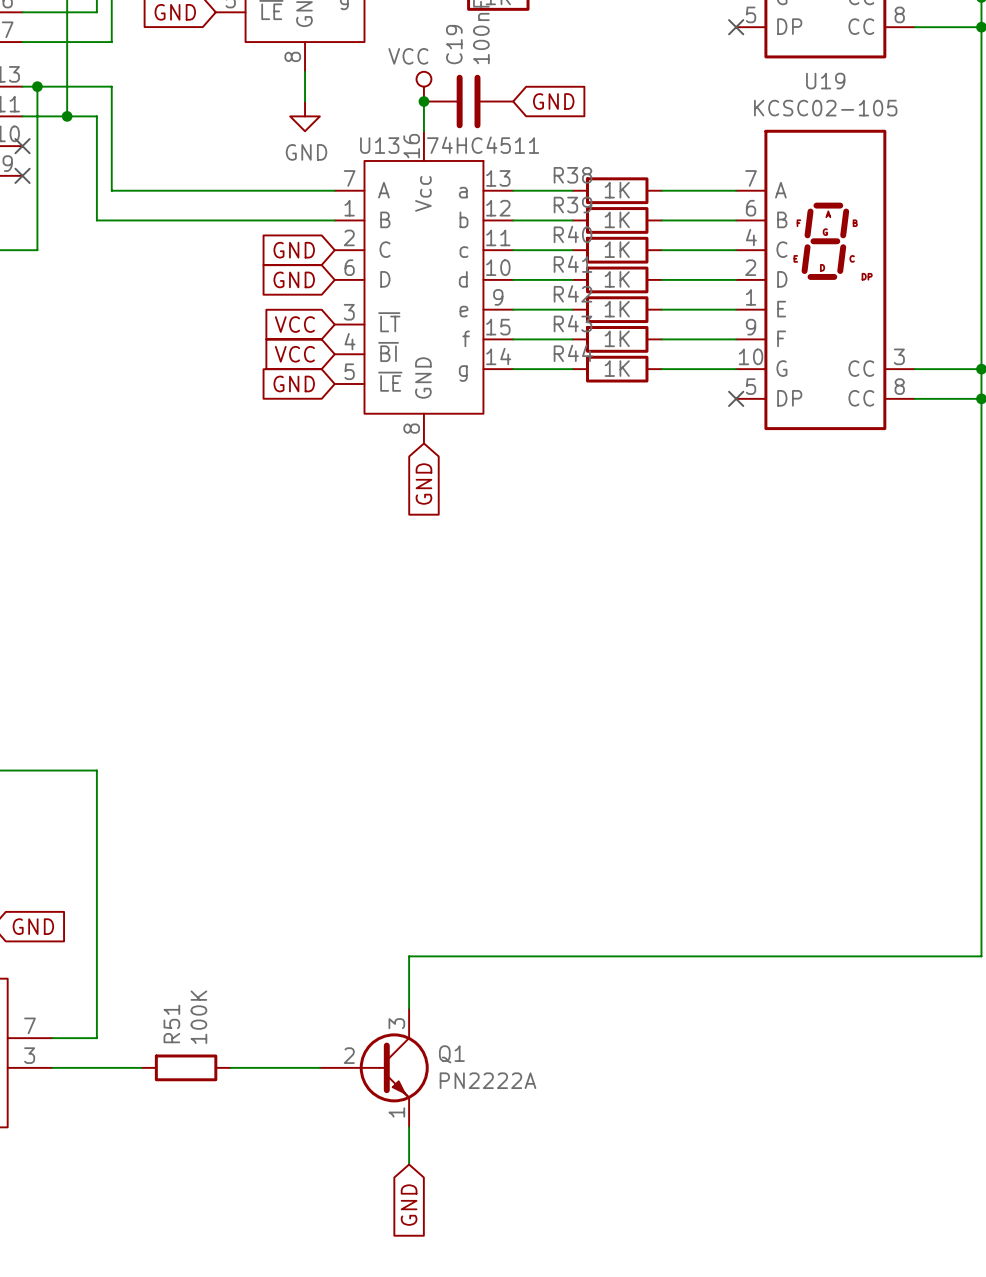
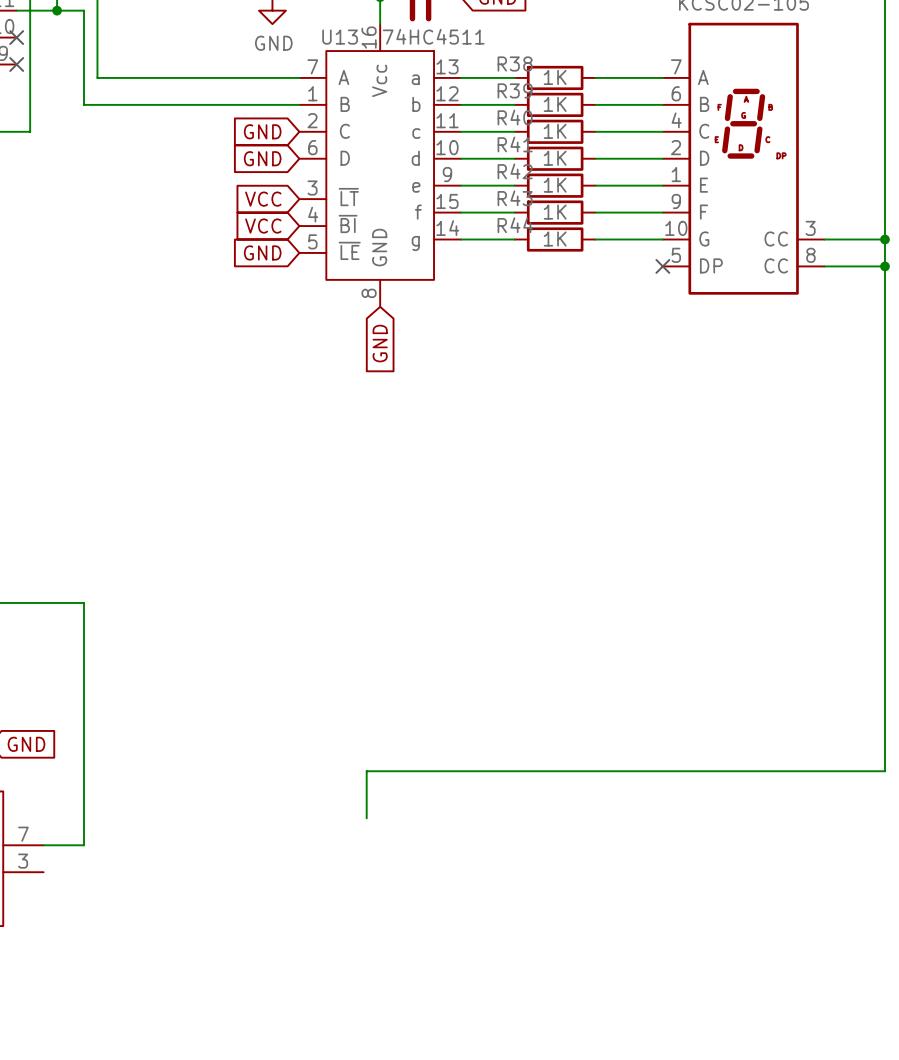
wire: (52, 1067) (141, 1067) -> none
R51: 100K (186, 1067) -> none
wire: (230, 1067) (319, 1067) -> none
Q1: PN2222A (374, 1067) -> none
wire: (409, 1127) (409, 1164) -> none
global label: GND (409, 1205) -> none

